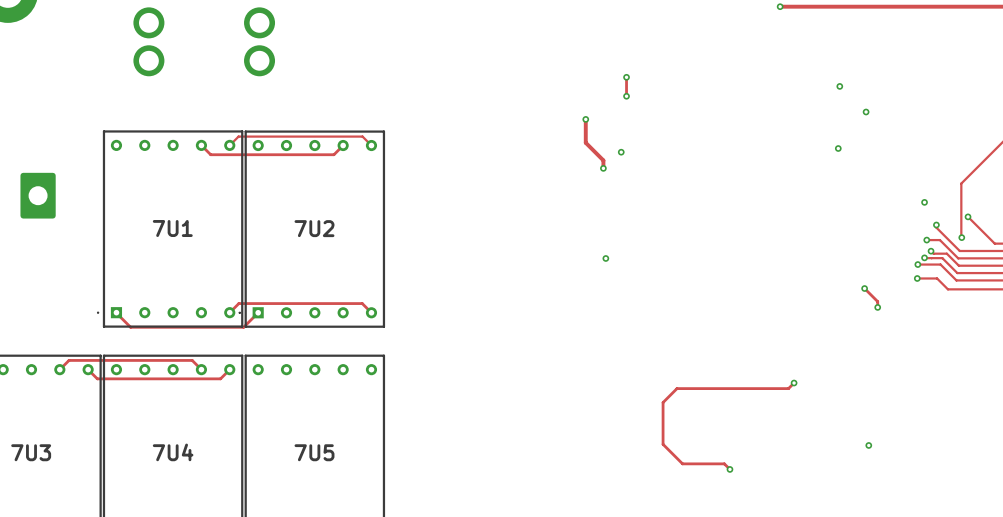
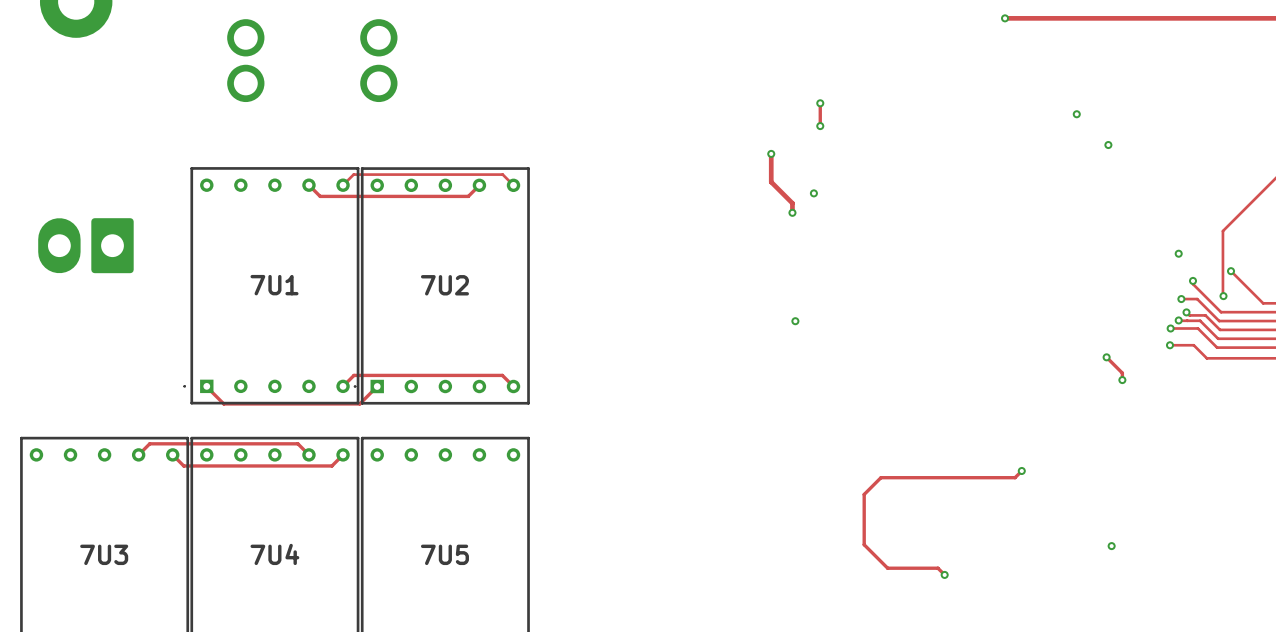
via: (838, 148) -> none

